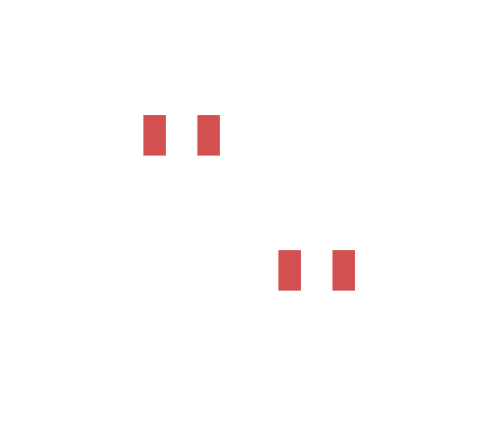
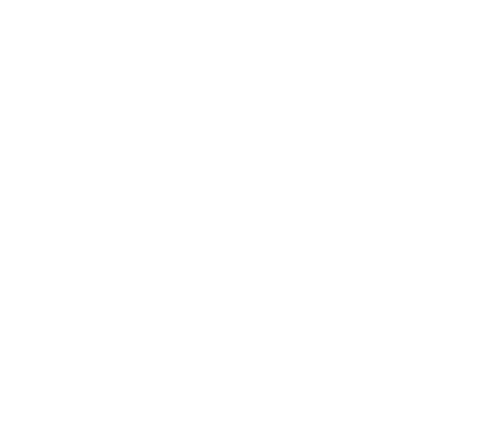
part: (181, 135) -> none
part: (316, 270) -> none

